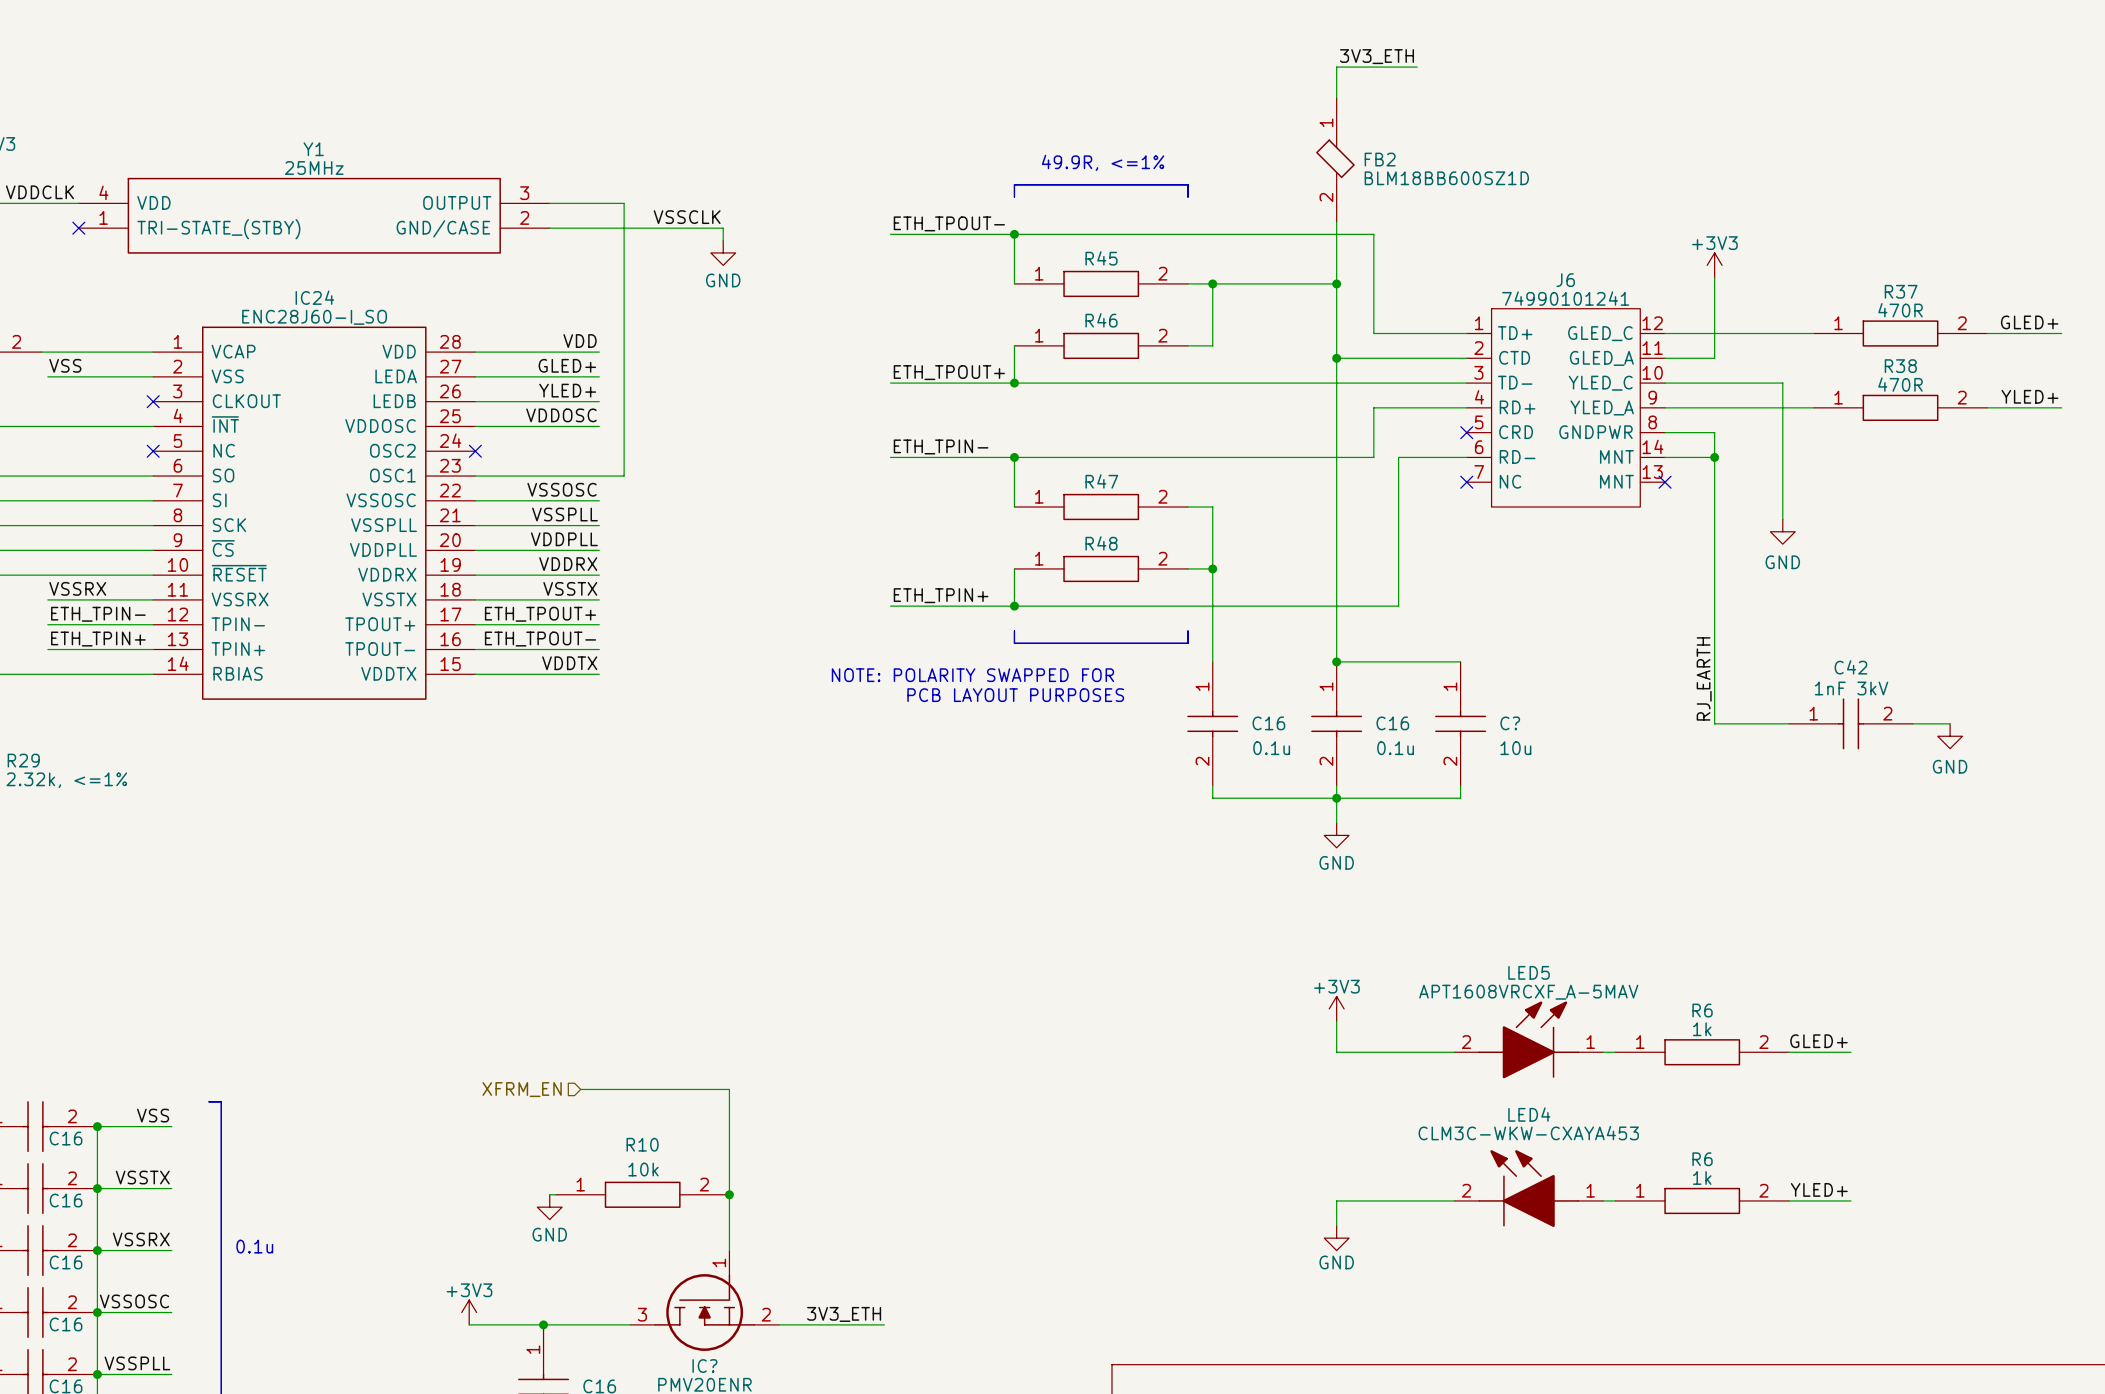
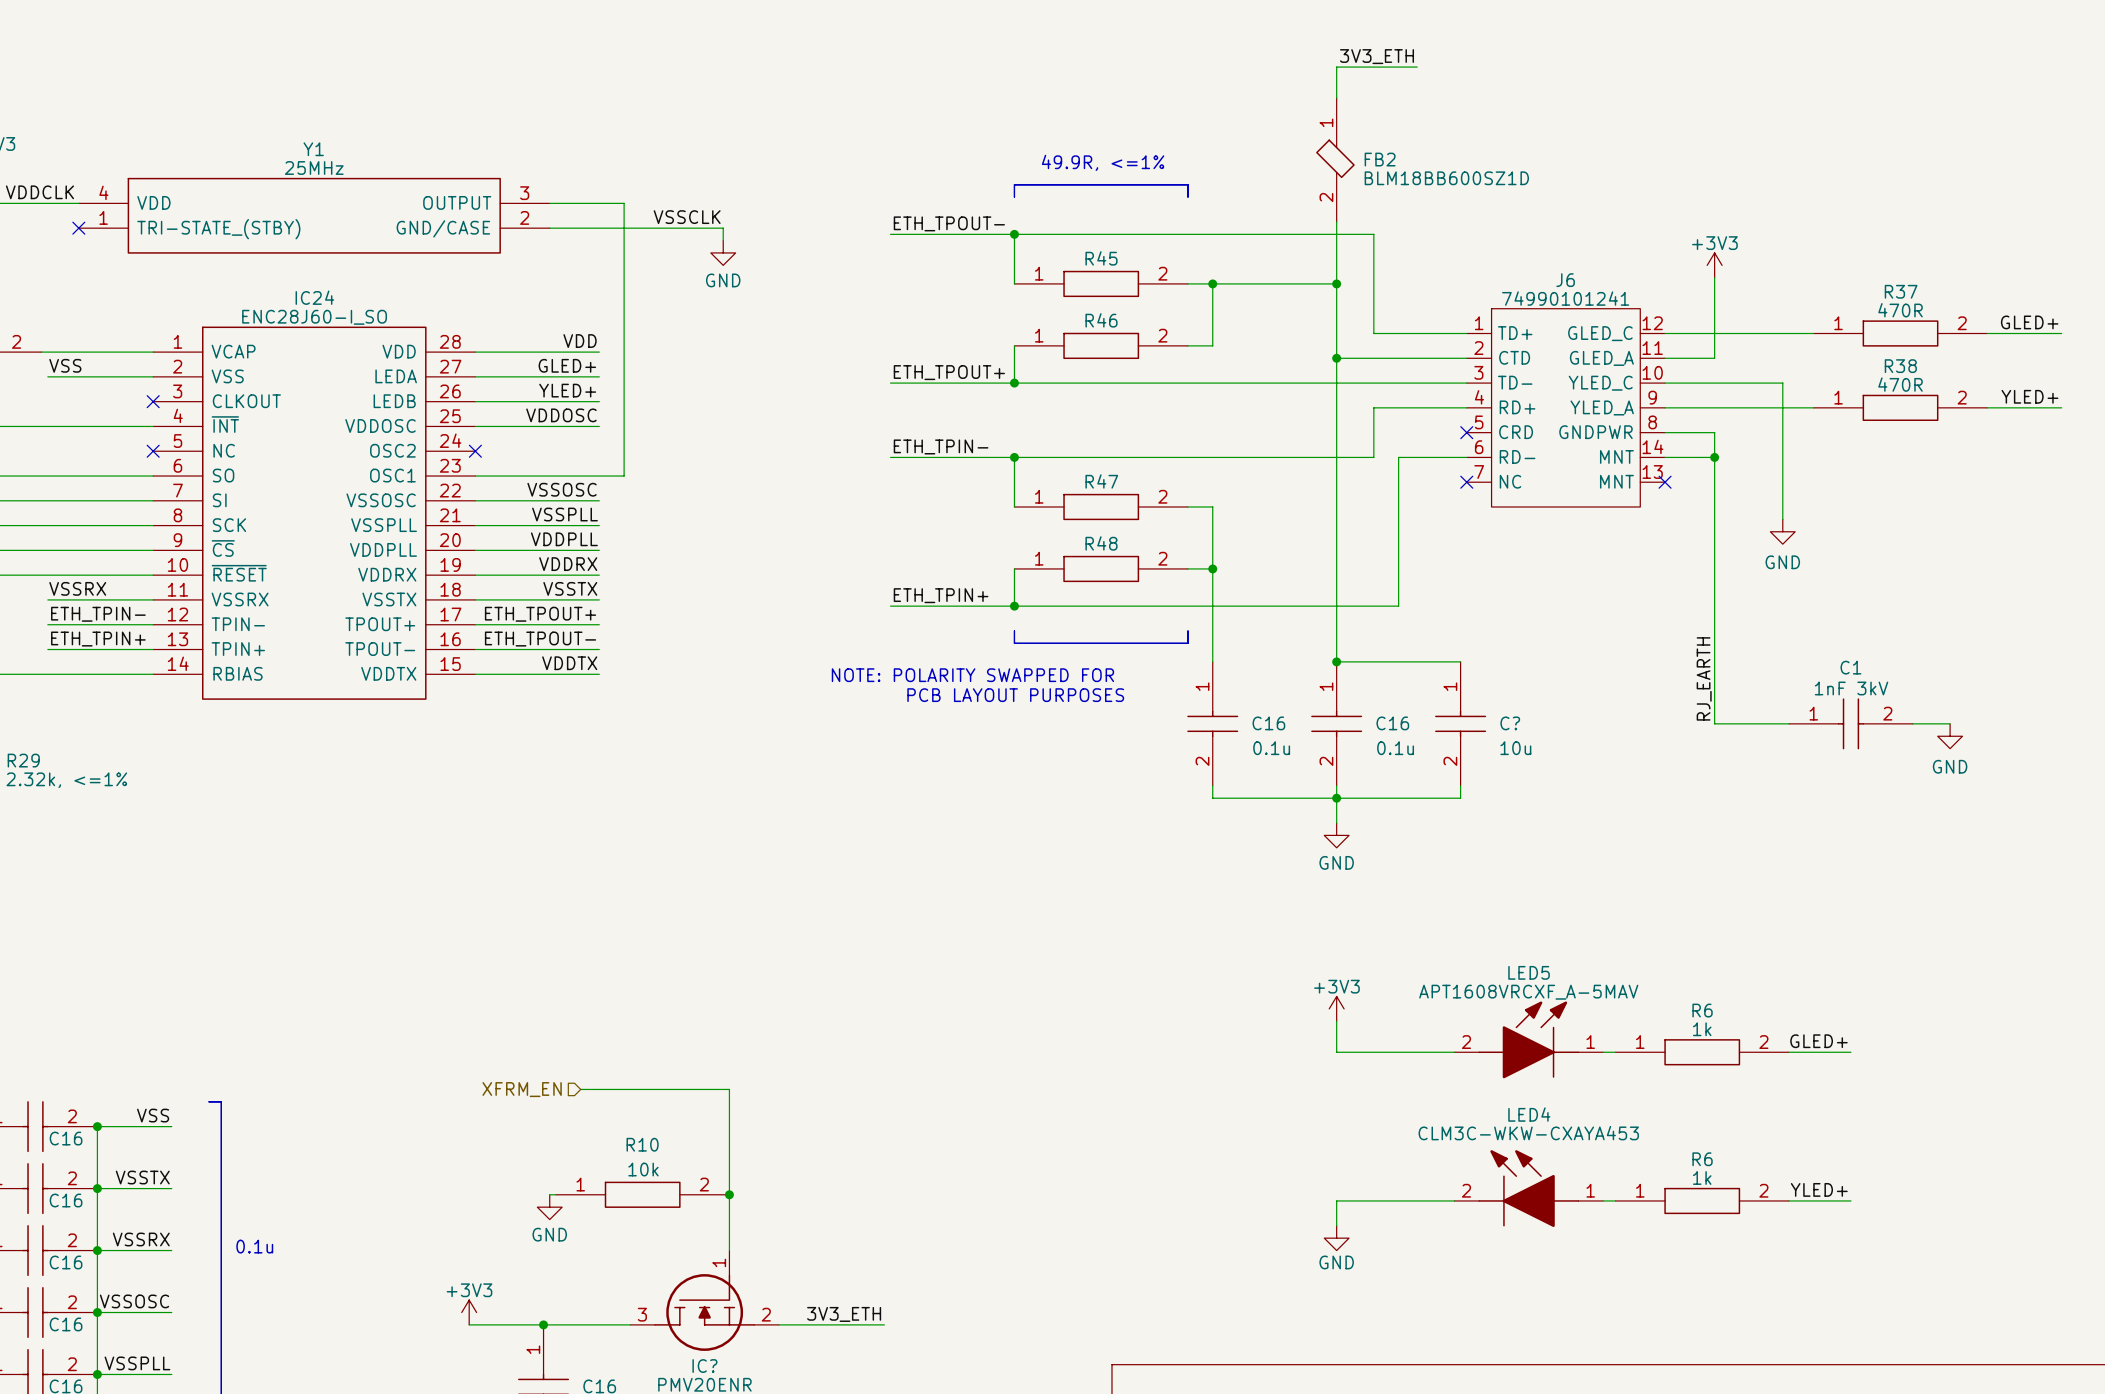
C42 name: C42 (1850, 667) -> C1 (1850, 667)

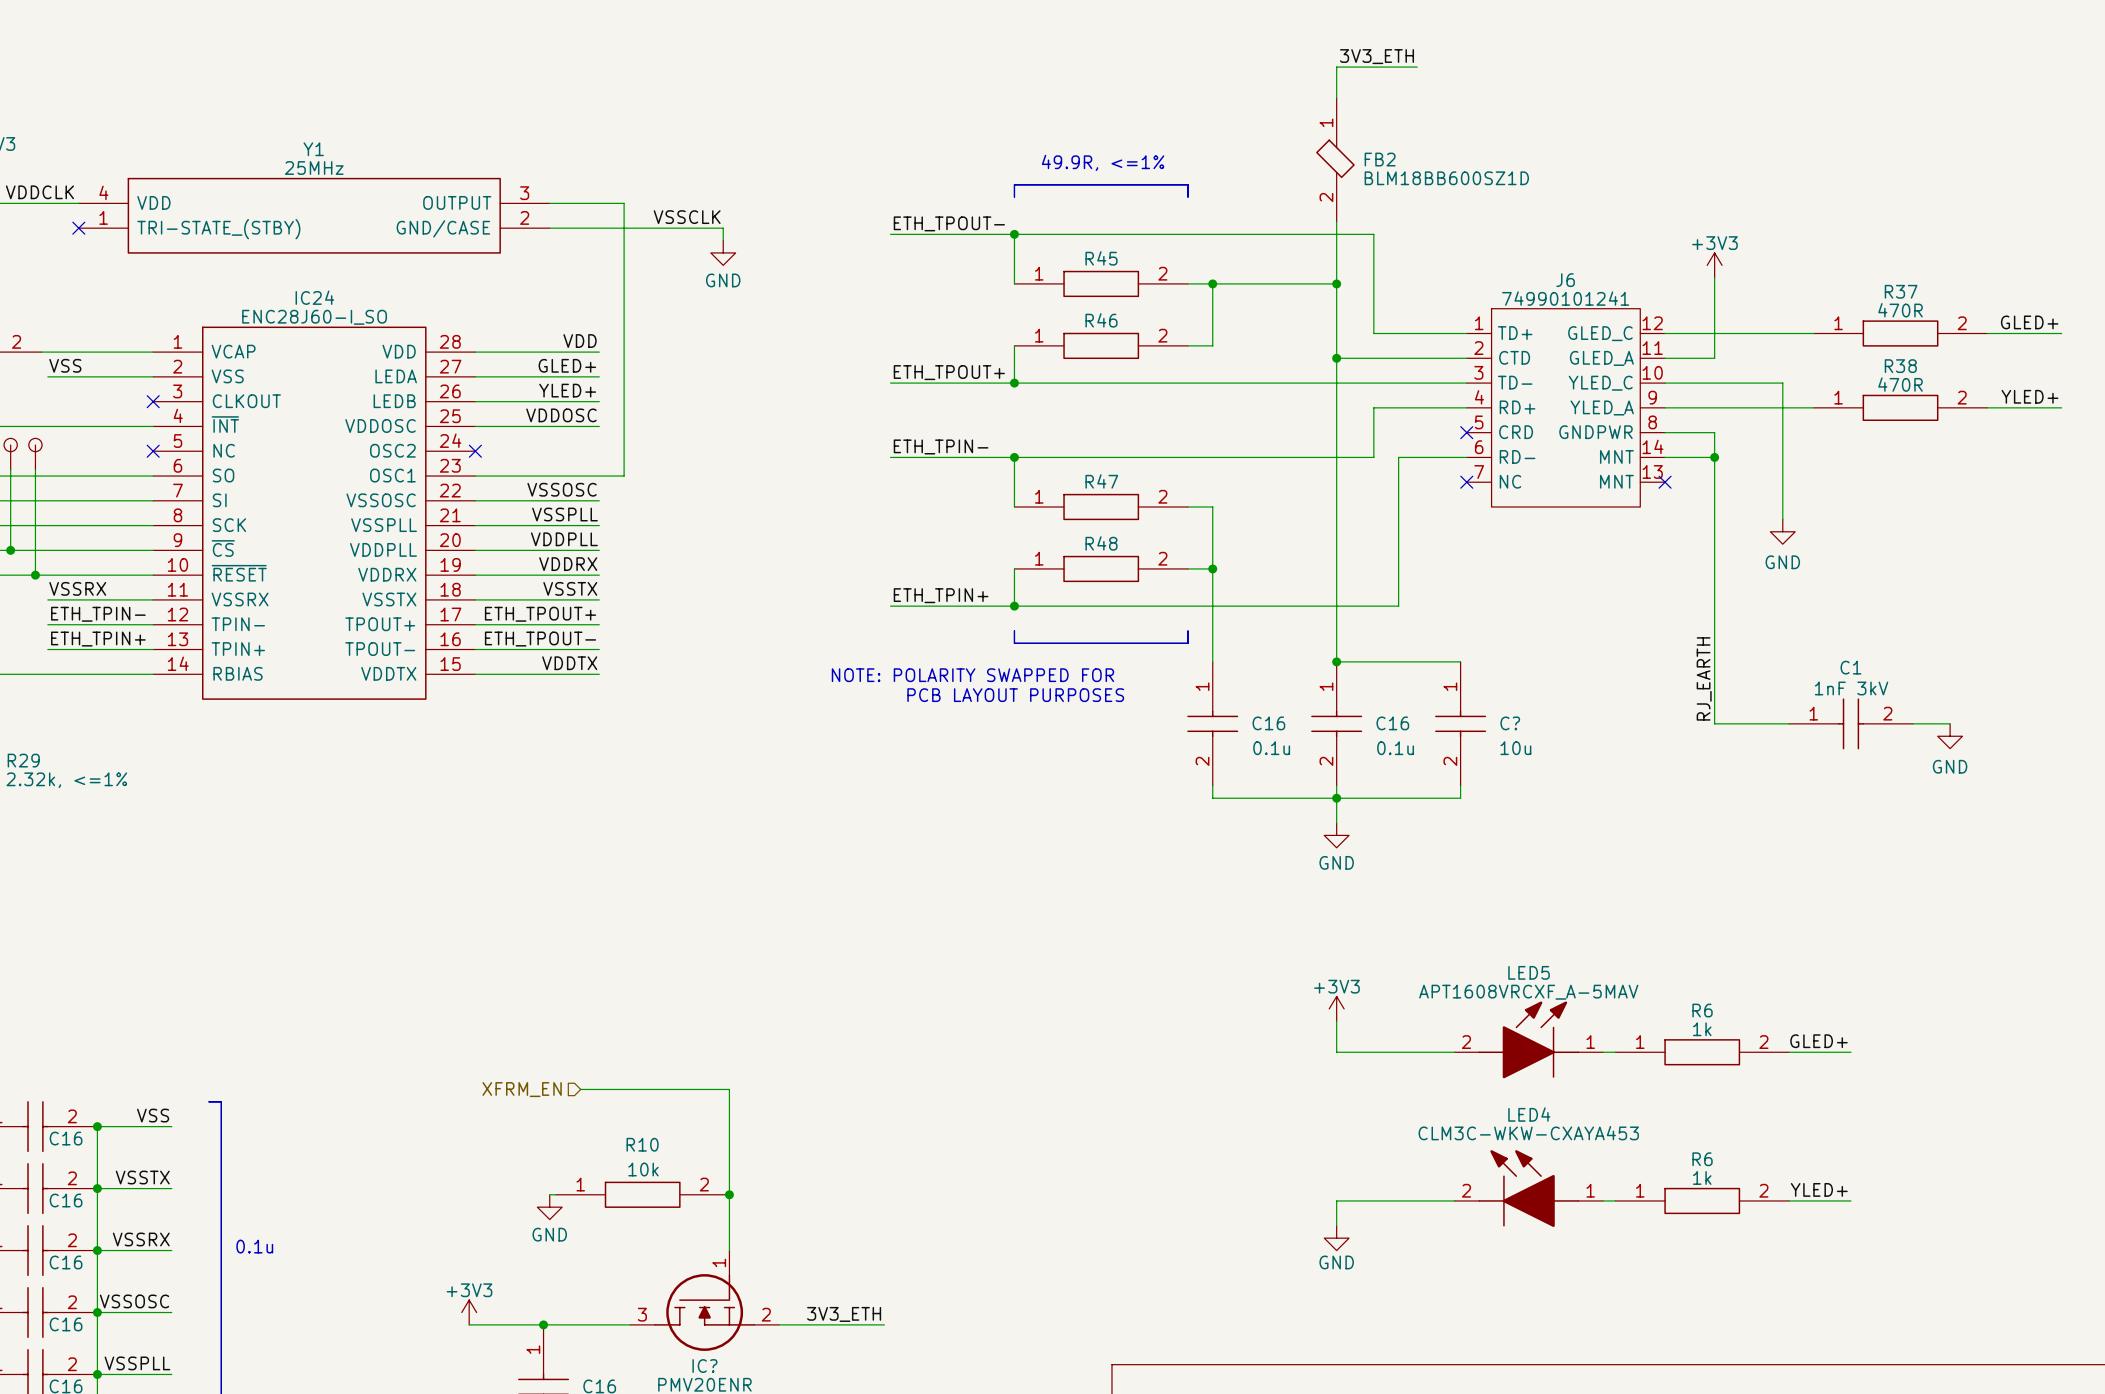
part: none -> (10, 454)
part: none -> (35, 454)
wire: none -> (10, 469) (10, 550)
wire: none -> (35, 469) (35, 575)
junction: none -> (10, 550)
junction: none -> (35, 575)

